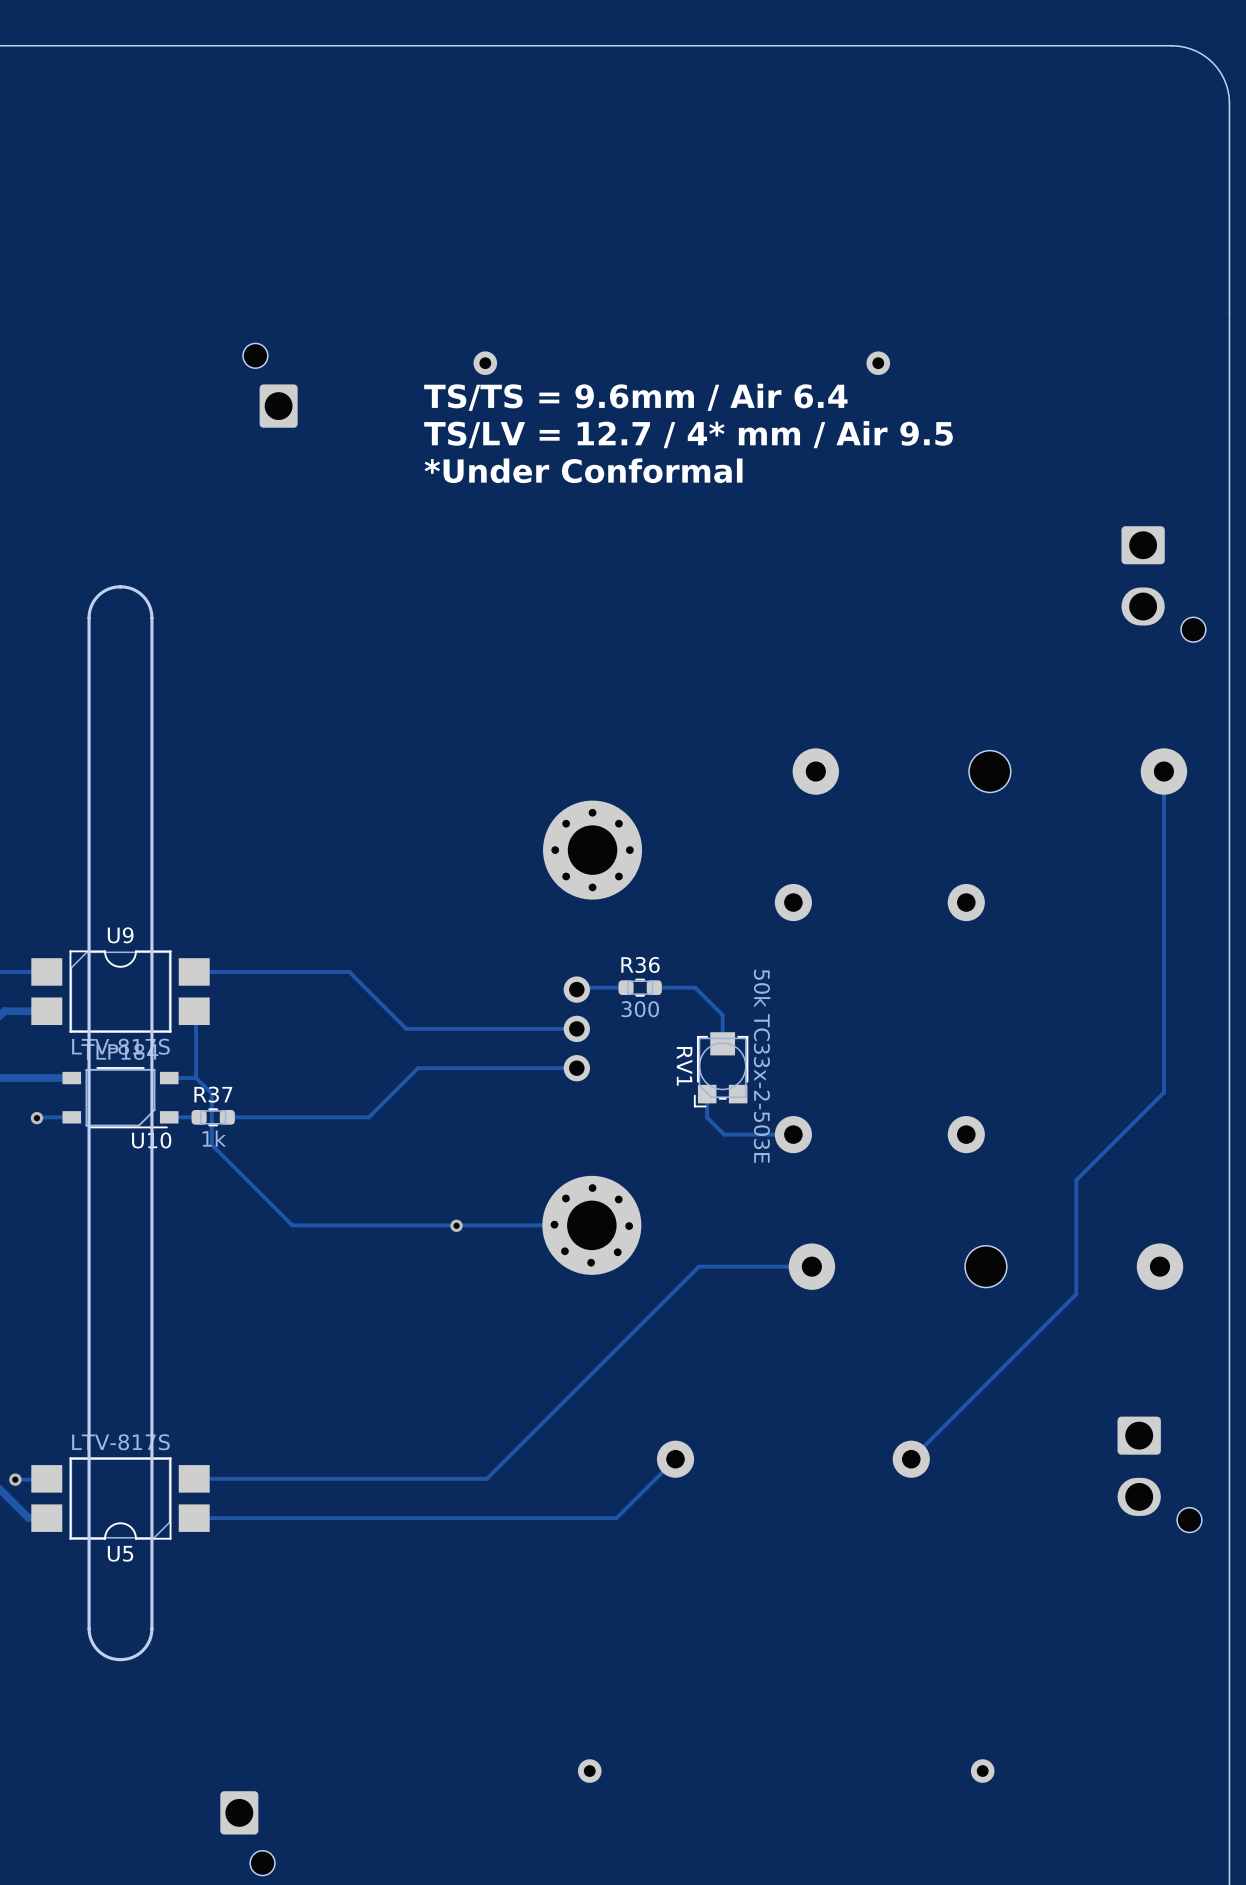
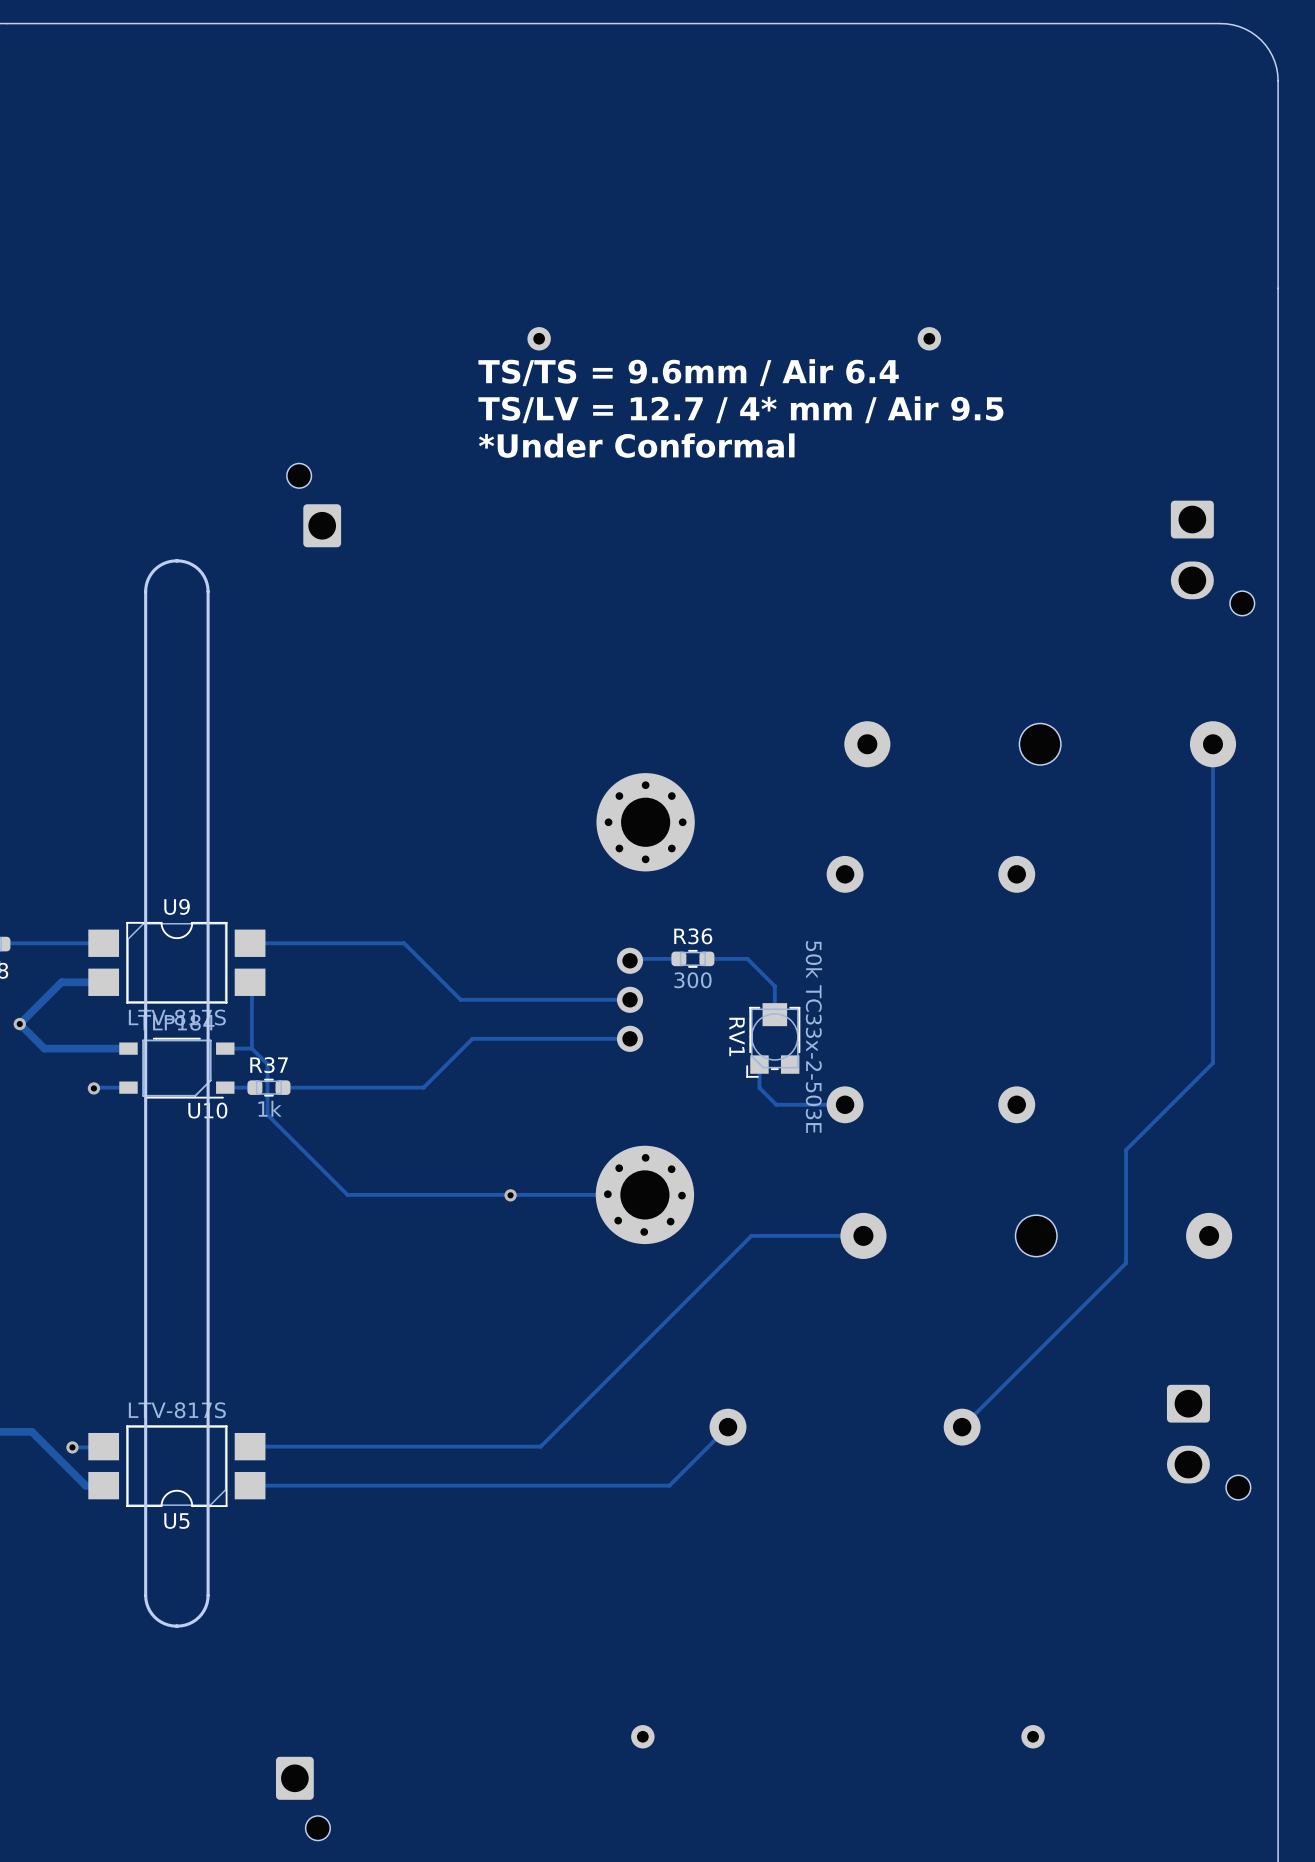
part position: (270, 385) -> (313, 505)

